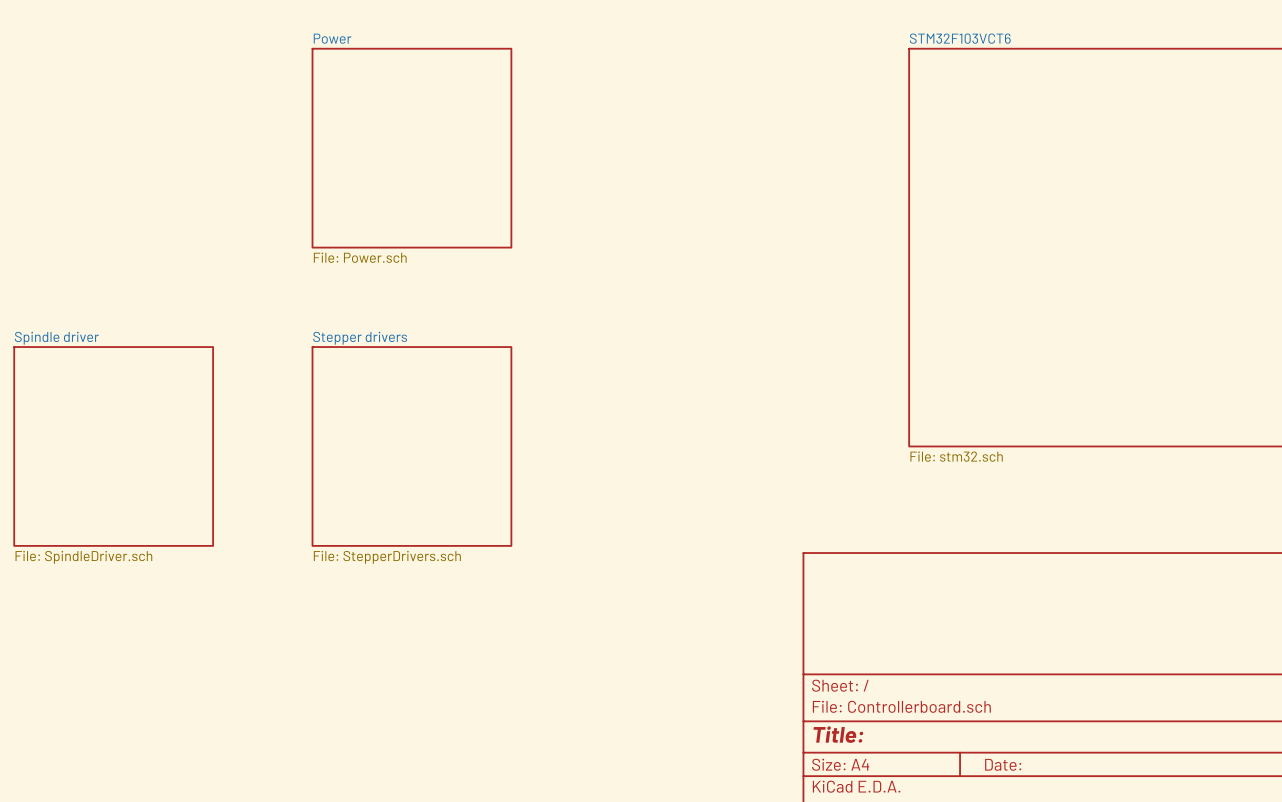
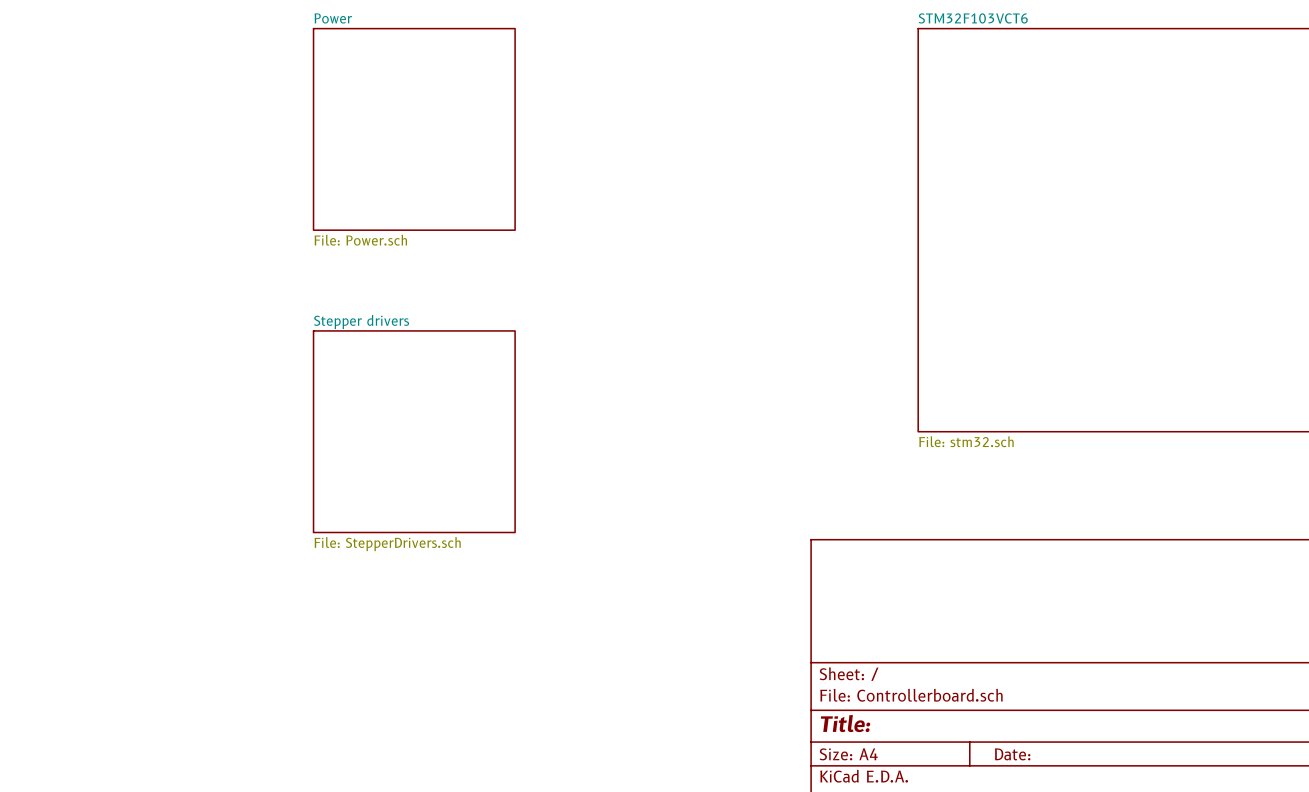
sheet Spindle driver: File: SpindleDriver.sch (113, 446) -> none

